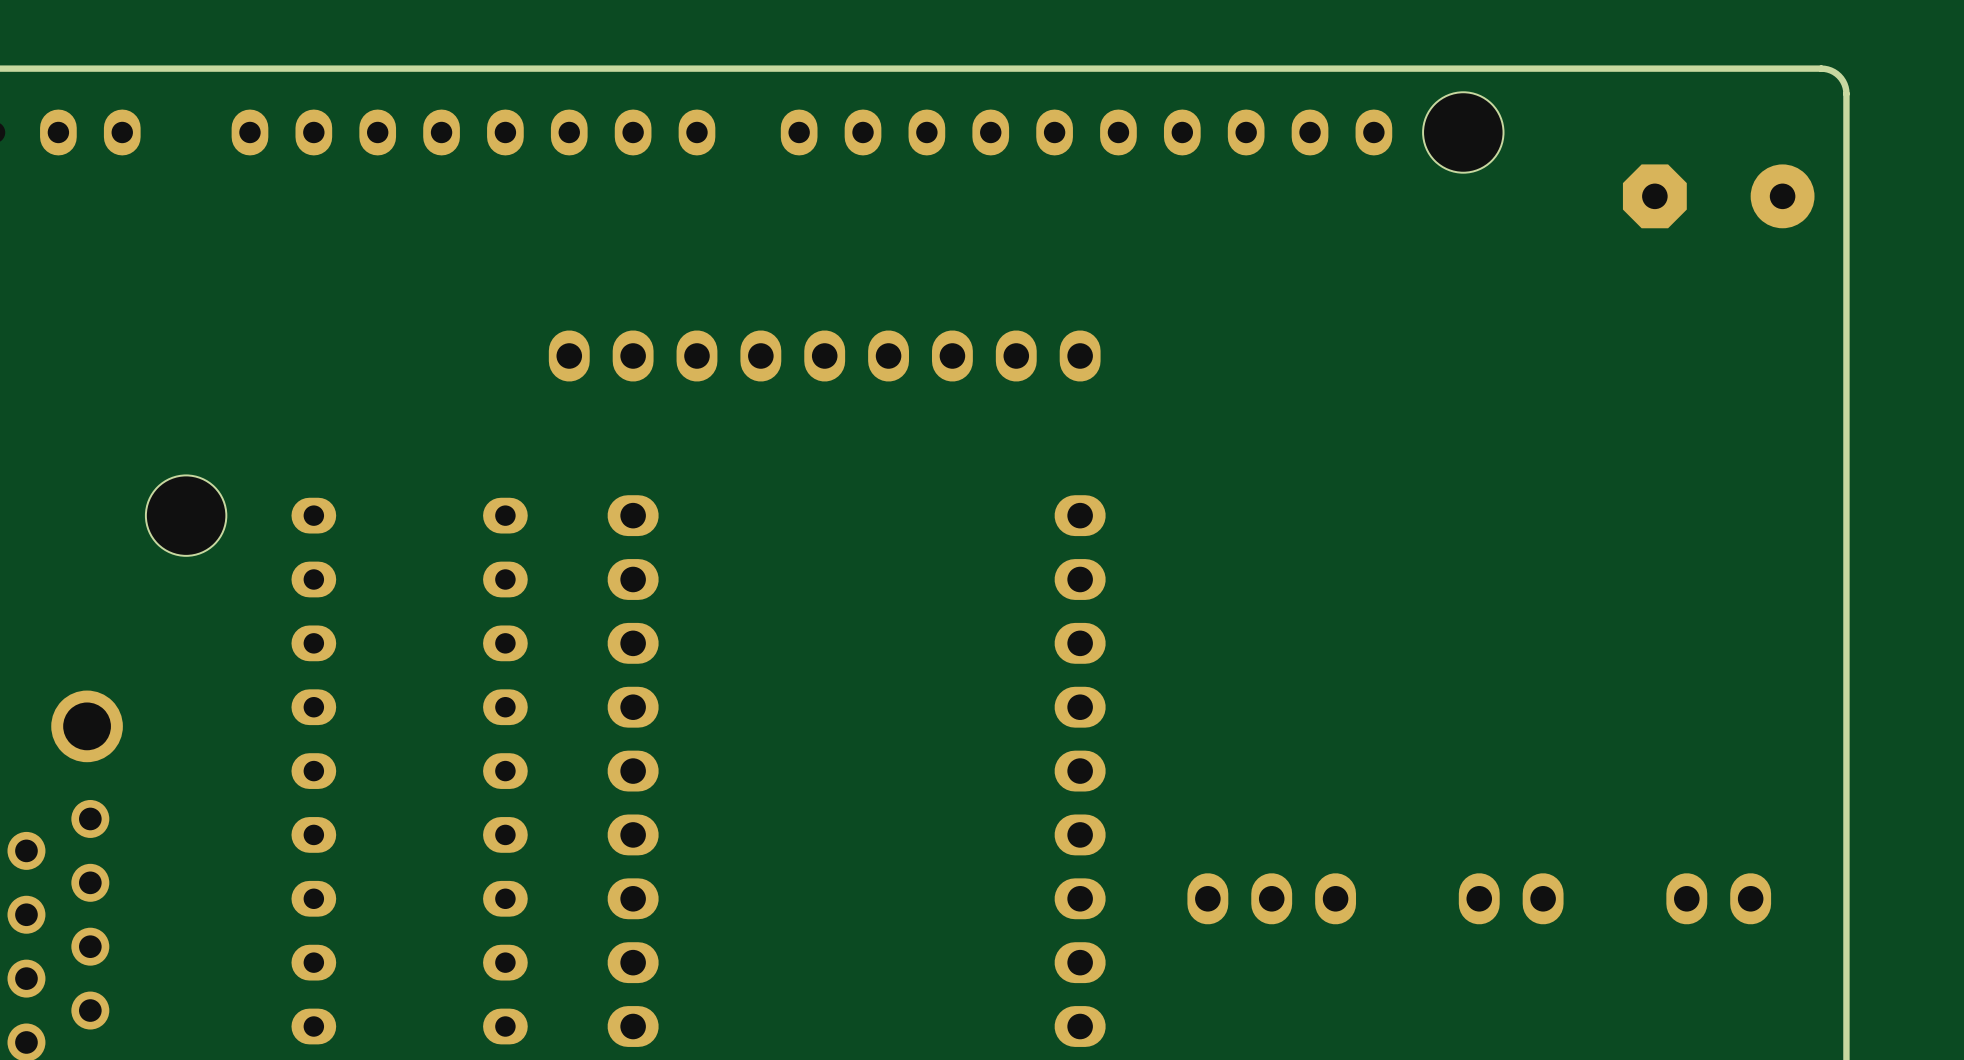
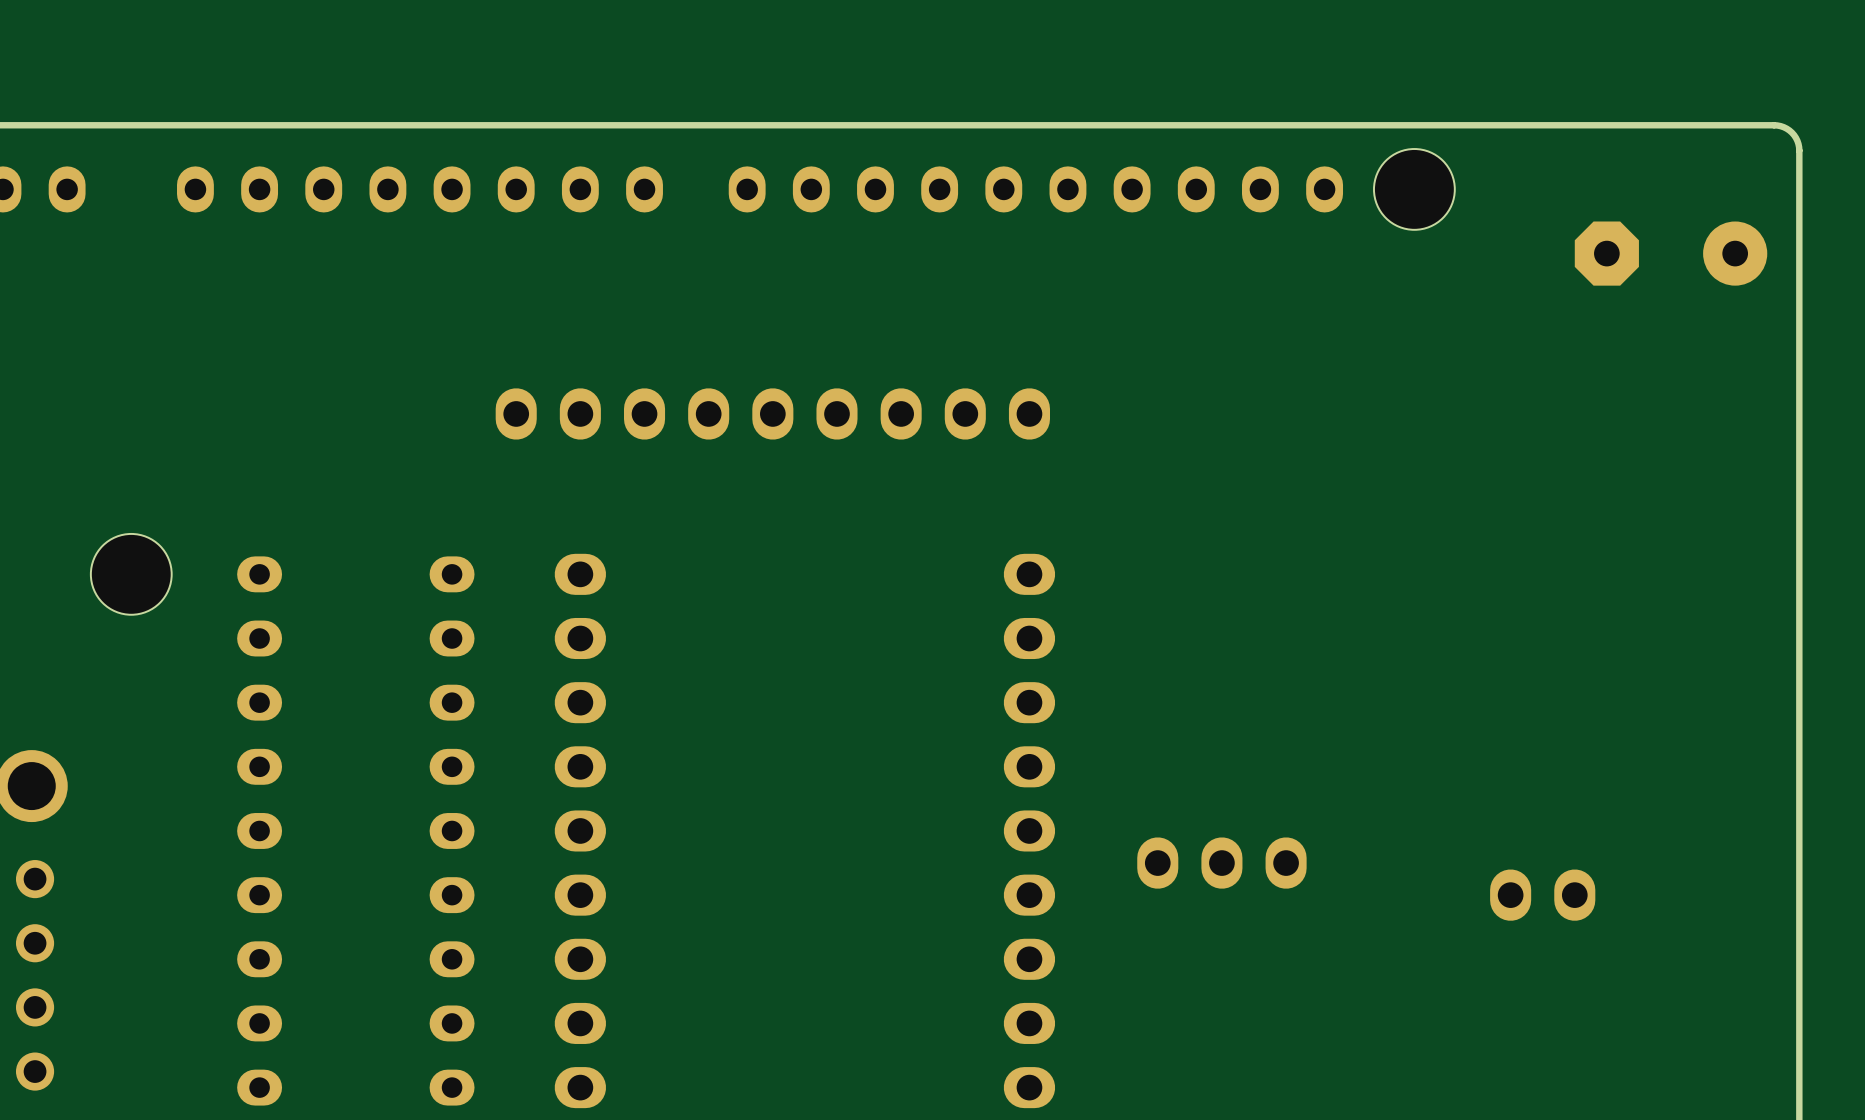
part: none -> (1542, 895)
part position: (1271, 898) -> (1221, 863)
part: (1511, 898) -> none
part: (1718, 898) -> none

